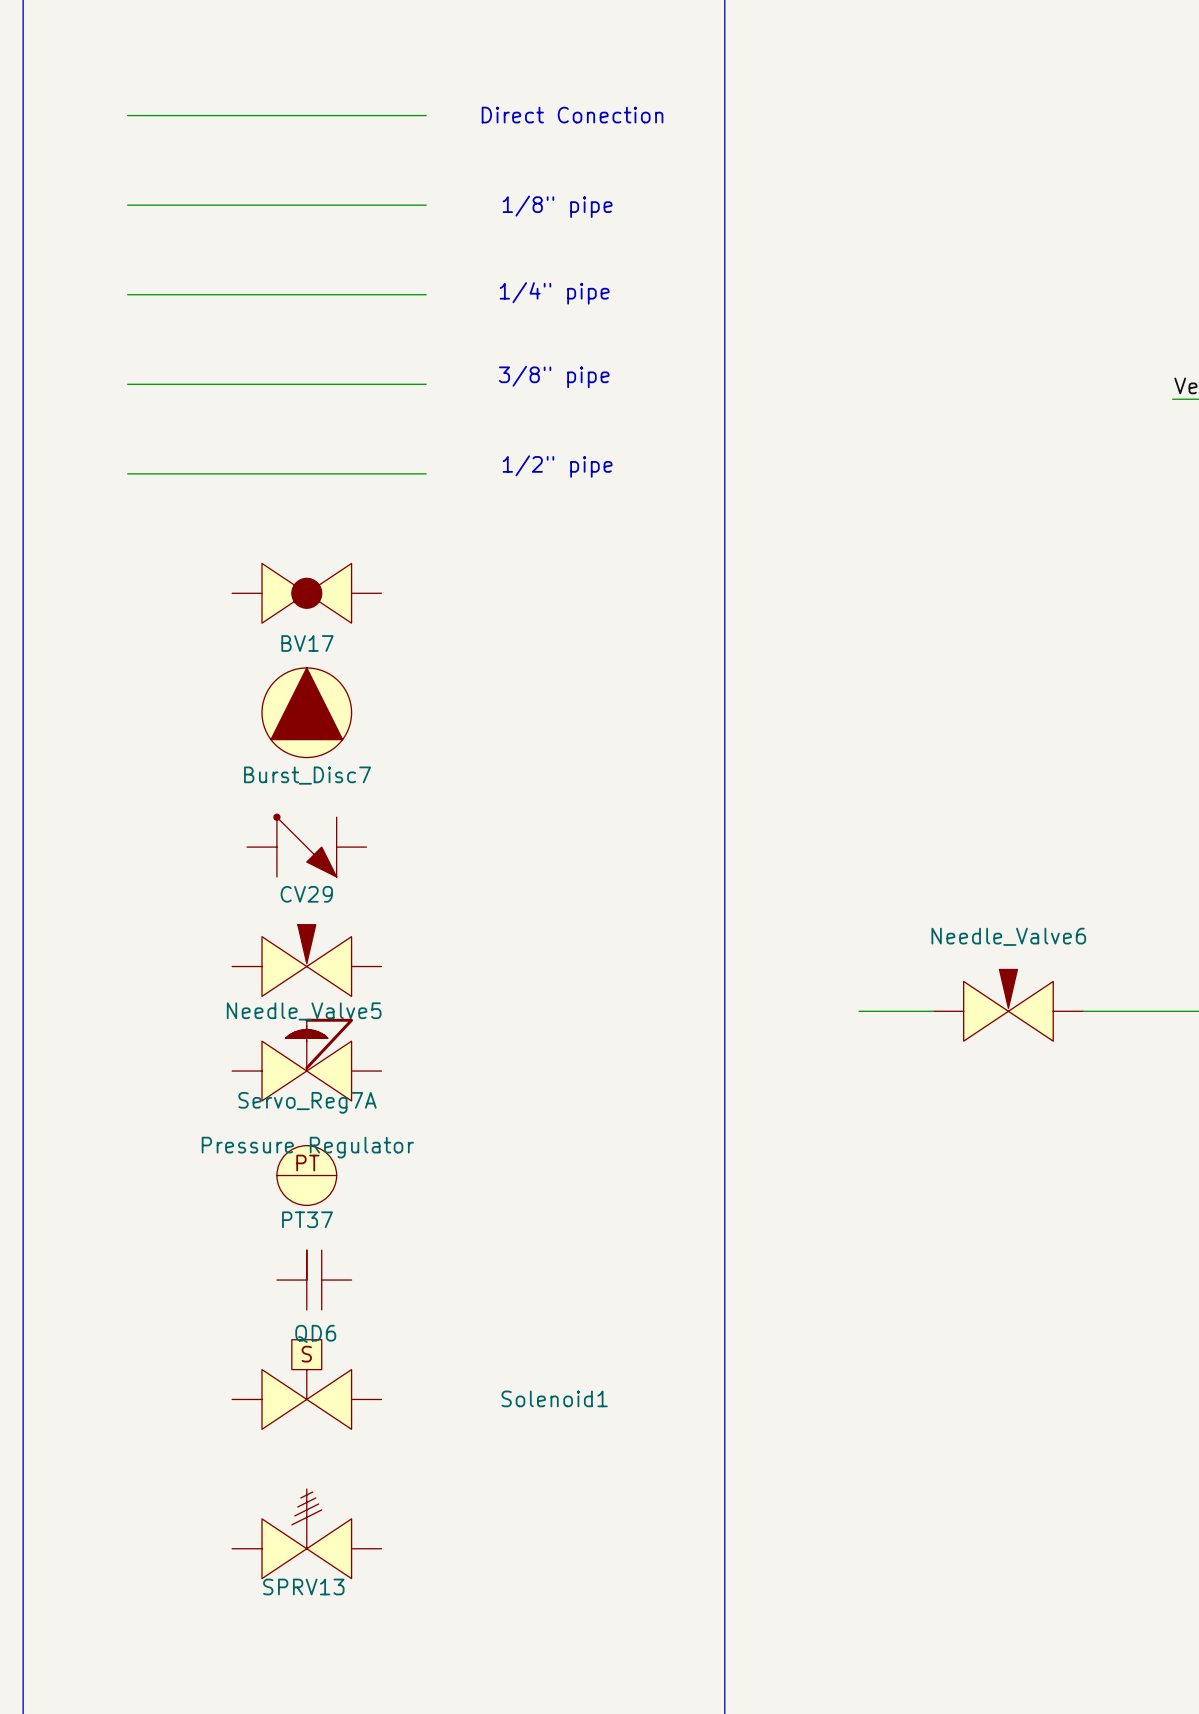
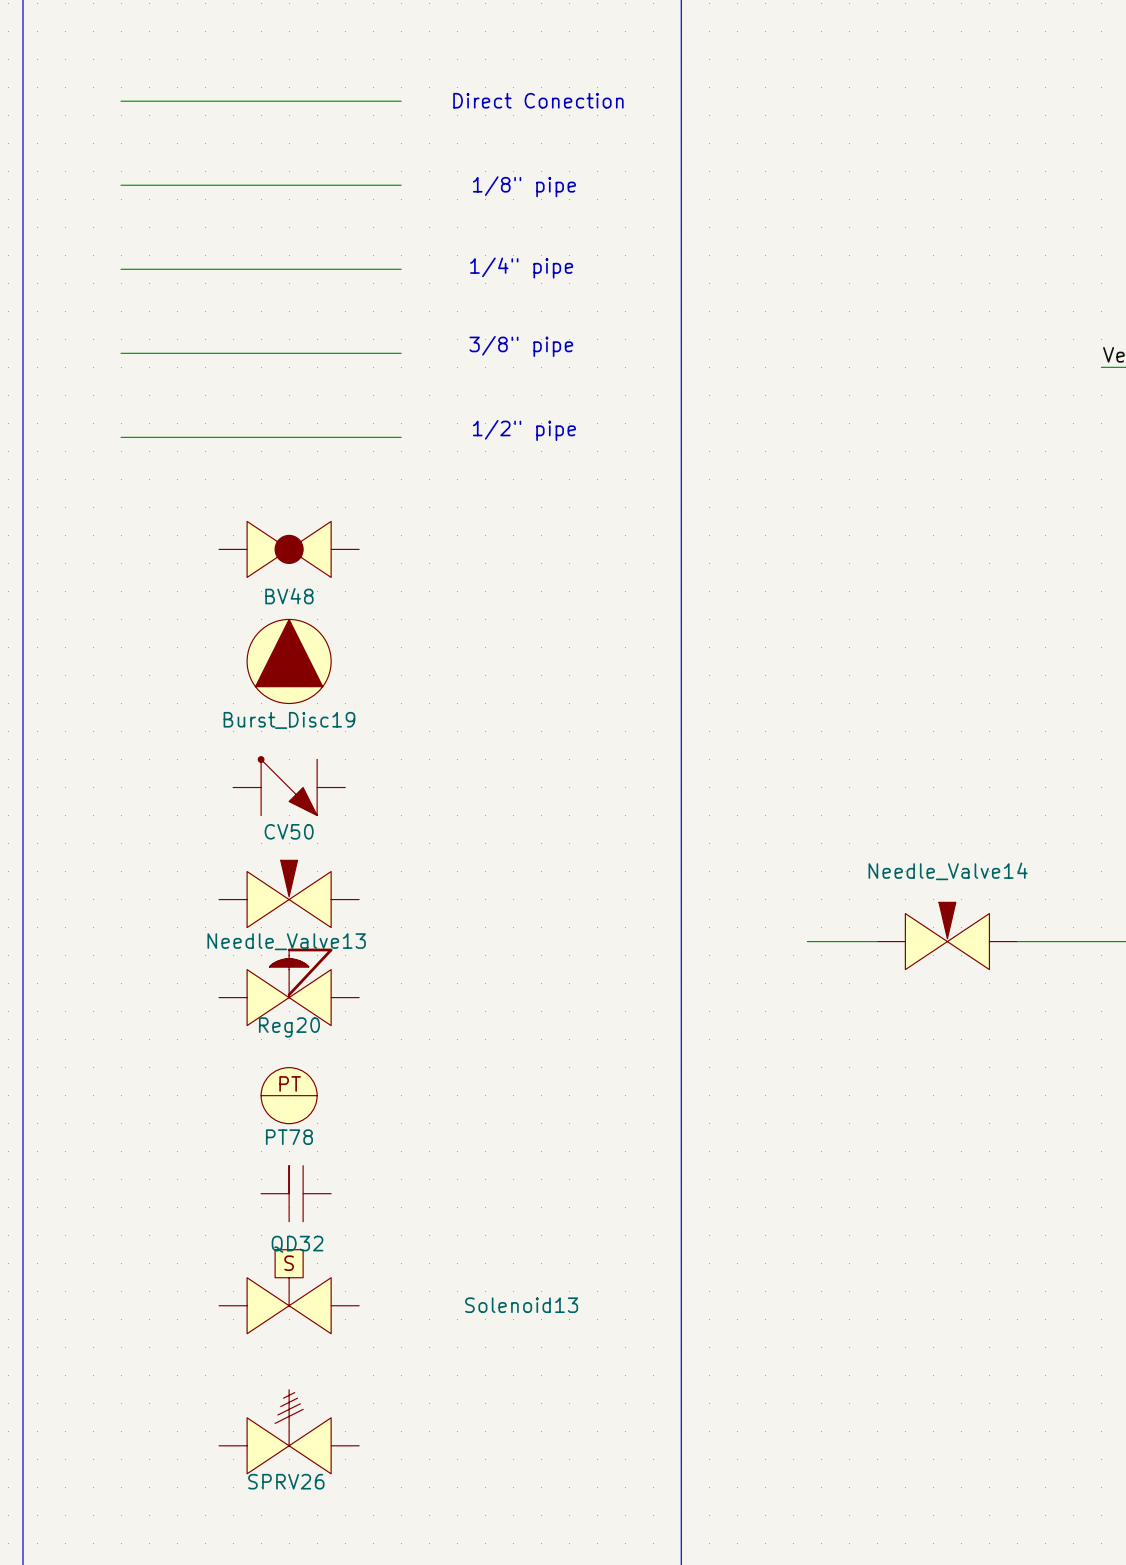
BV17 name: BV17 (307, 643) -> BV48 (289, 596)
Burst_Disc7 name: Burst_Disc7 (307, 775) -> Burst_Disc19 (289, 720)
CV29 name: CV29 (306, 894) -> CV50 (289, 831)
Needle_Valve6 name: Needle_Valve6 (1008, 936) -> Needle_Valve14 (948, 871)
Needle_Valve5 name: Needle_Valve5 (304, 1011) -> Needle_Valve13 (286, 941)
Servo_Reg7A name: Servo_Reg7A (307, 1102) -> Reg20 (289, 1027)
Servo_Reg7A text: Pressure Regulator (307, 1147) -> none
PT37 name: PT37 (307, 1219) -> PT78 (289, 1137)
QD6 name: QD6 (315, 1333) -> QD32 (297, 1244)
Solenoid1 name: Solenoid1 (554, 1398) -> Solenoid13 (521, 1305)
SPRV13 name: SPRV13 (303, 1587) -> SPRV26 (286, 1481)

